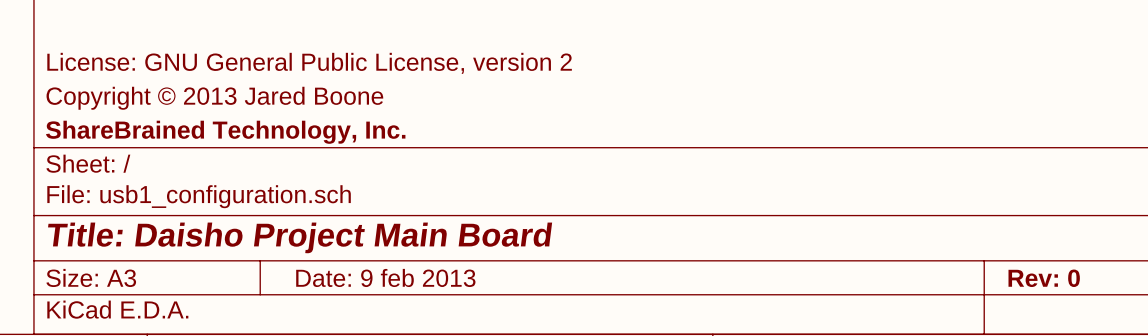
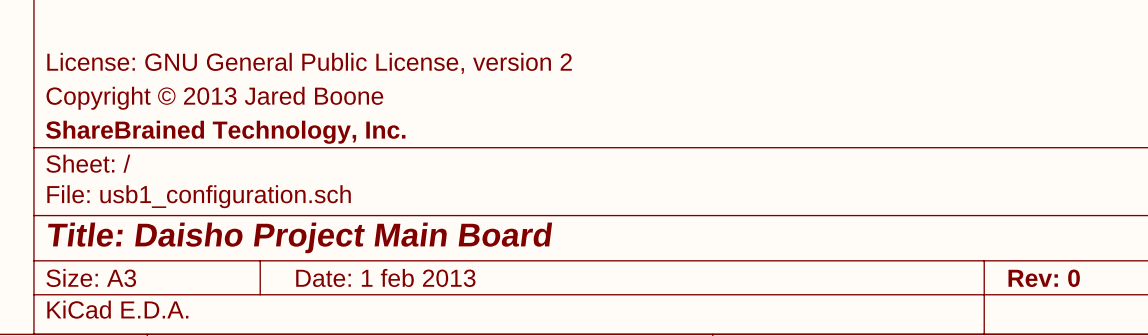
title block: Date: 9 feb 2013 (385, 277) -> Date: 1 feb 2013 (385, 277)

